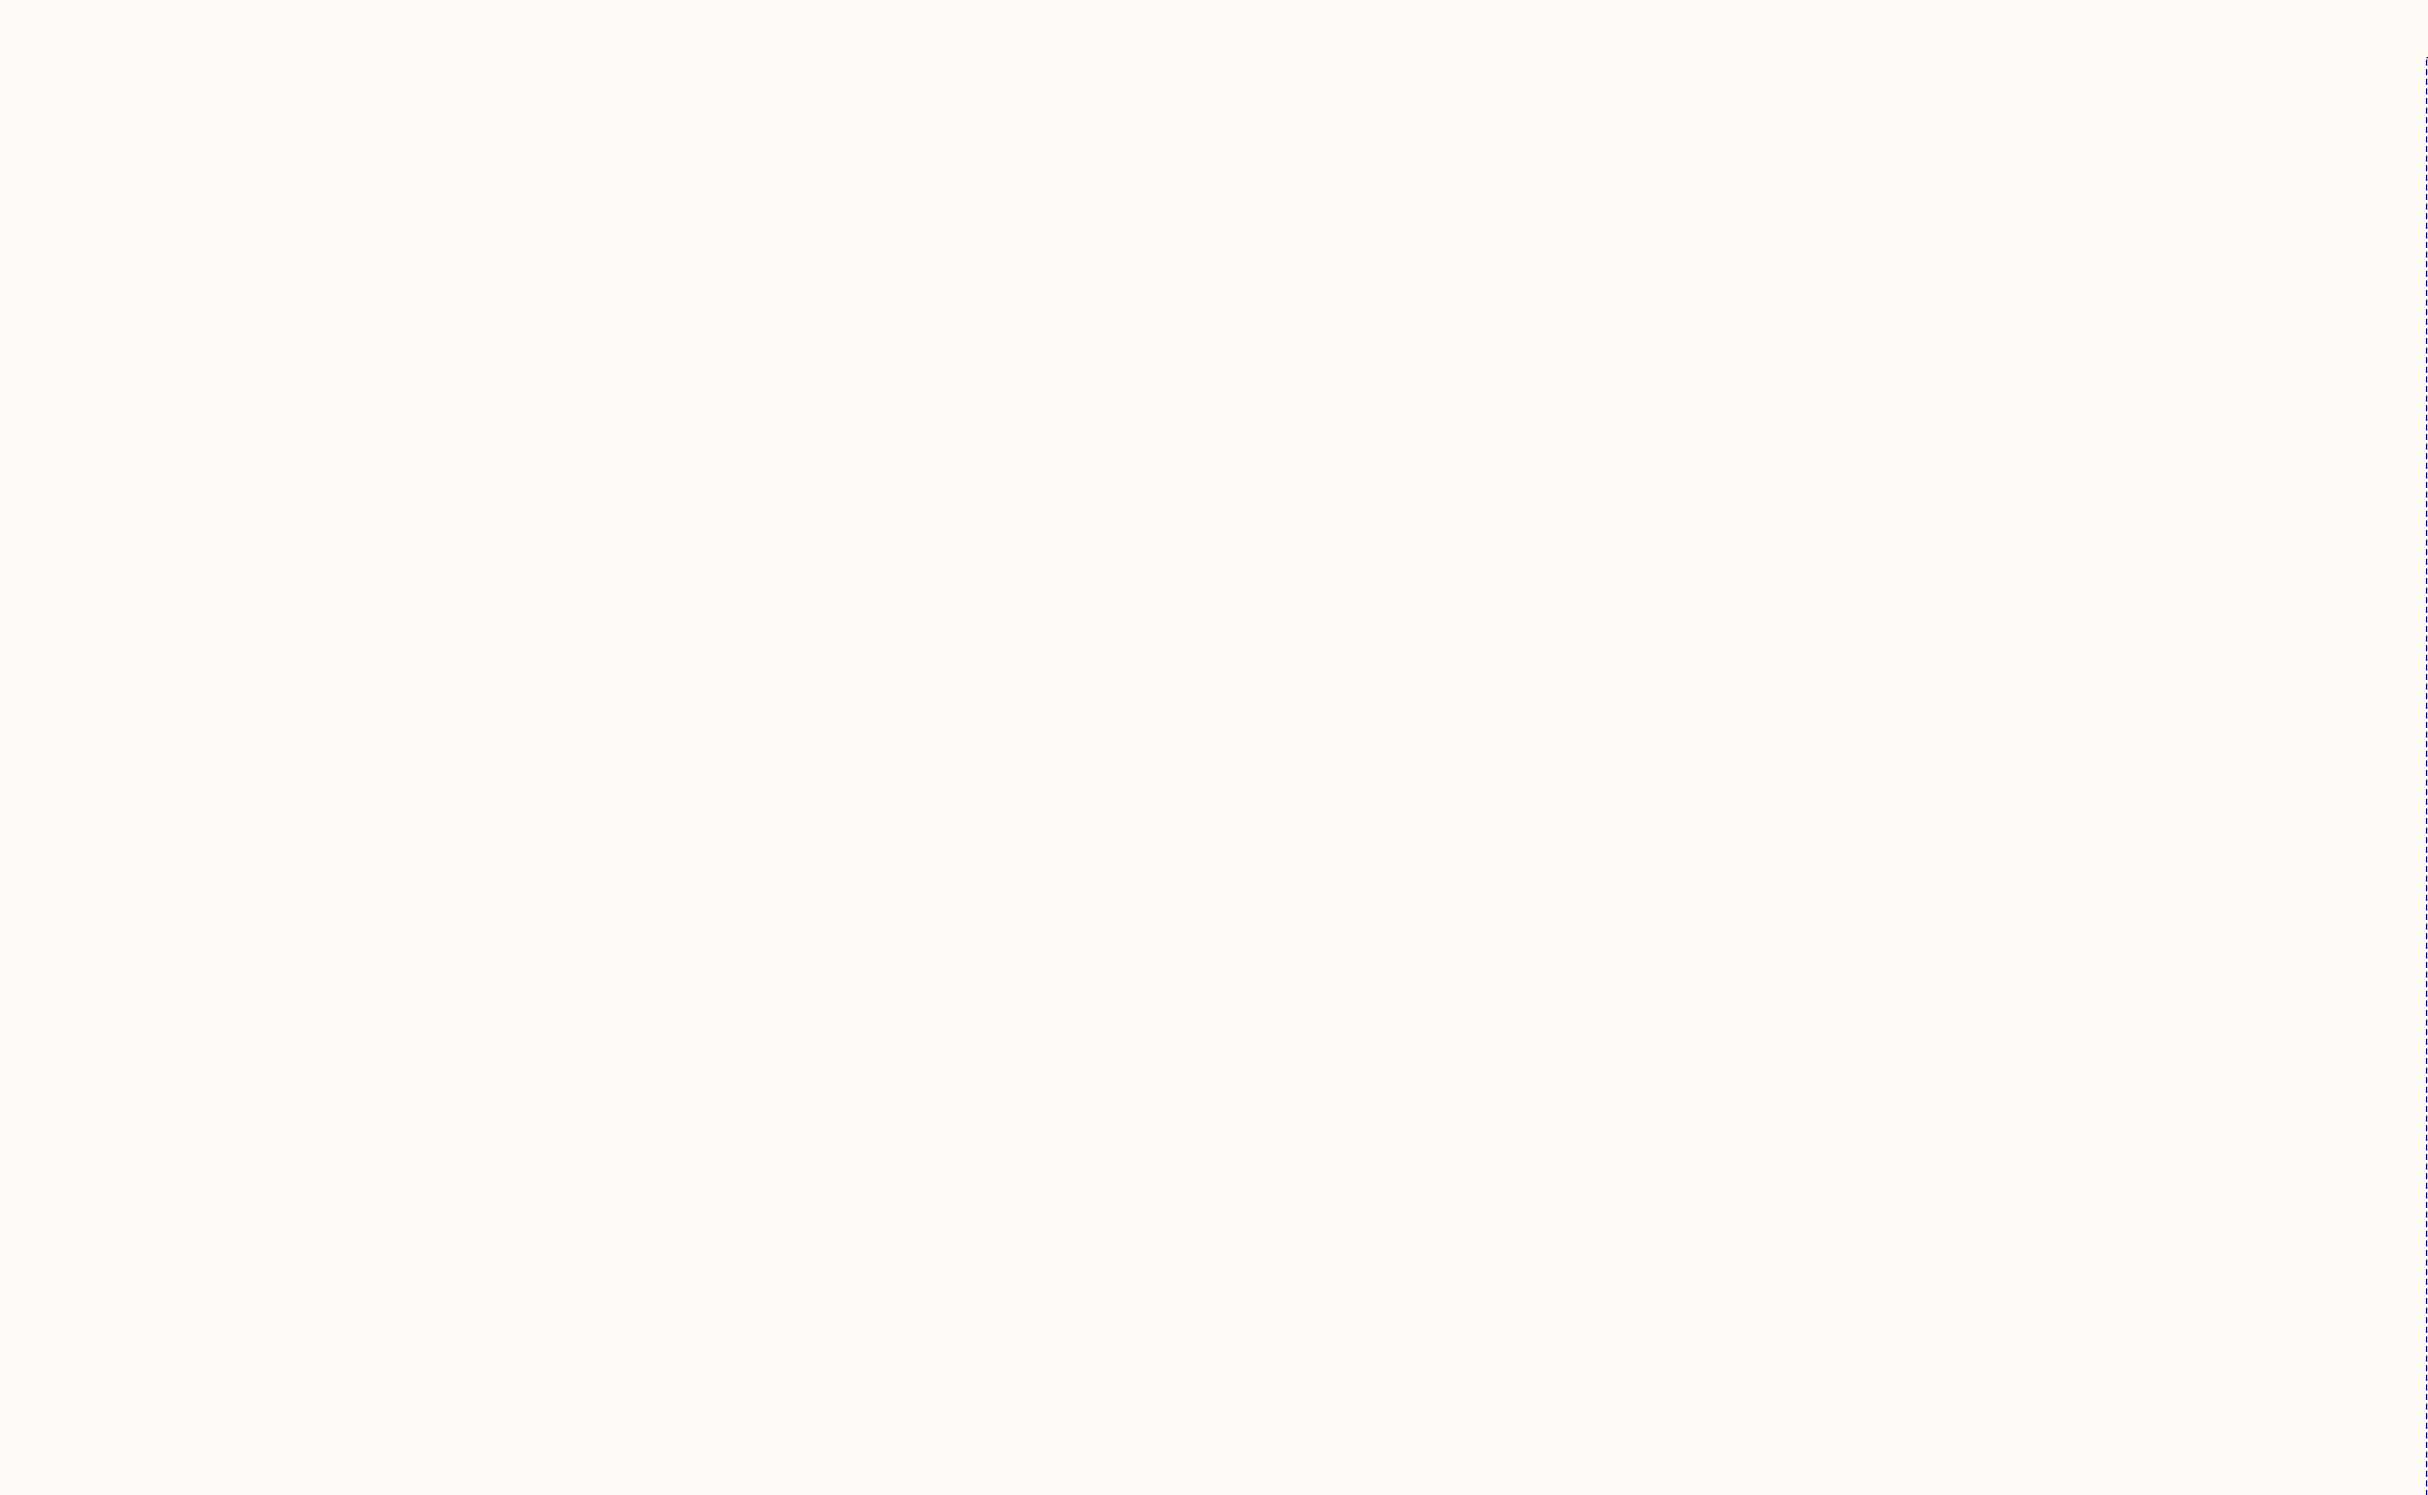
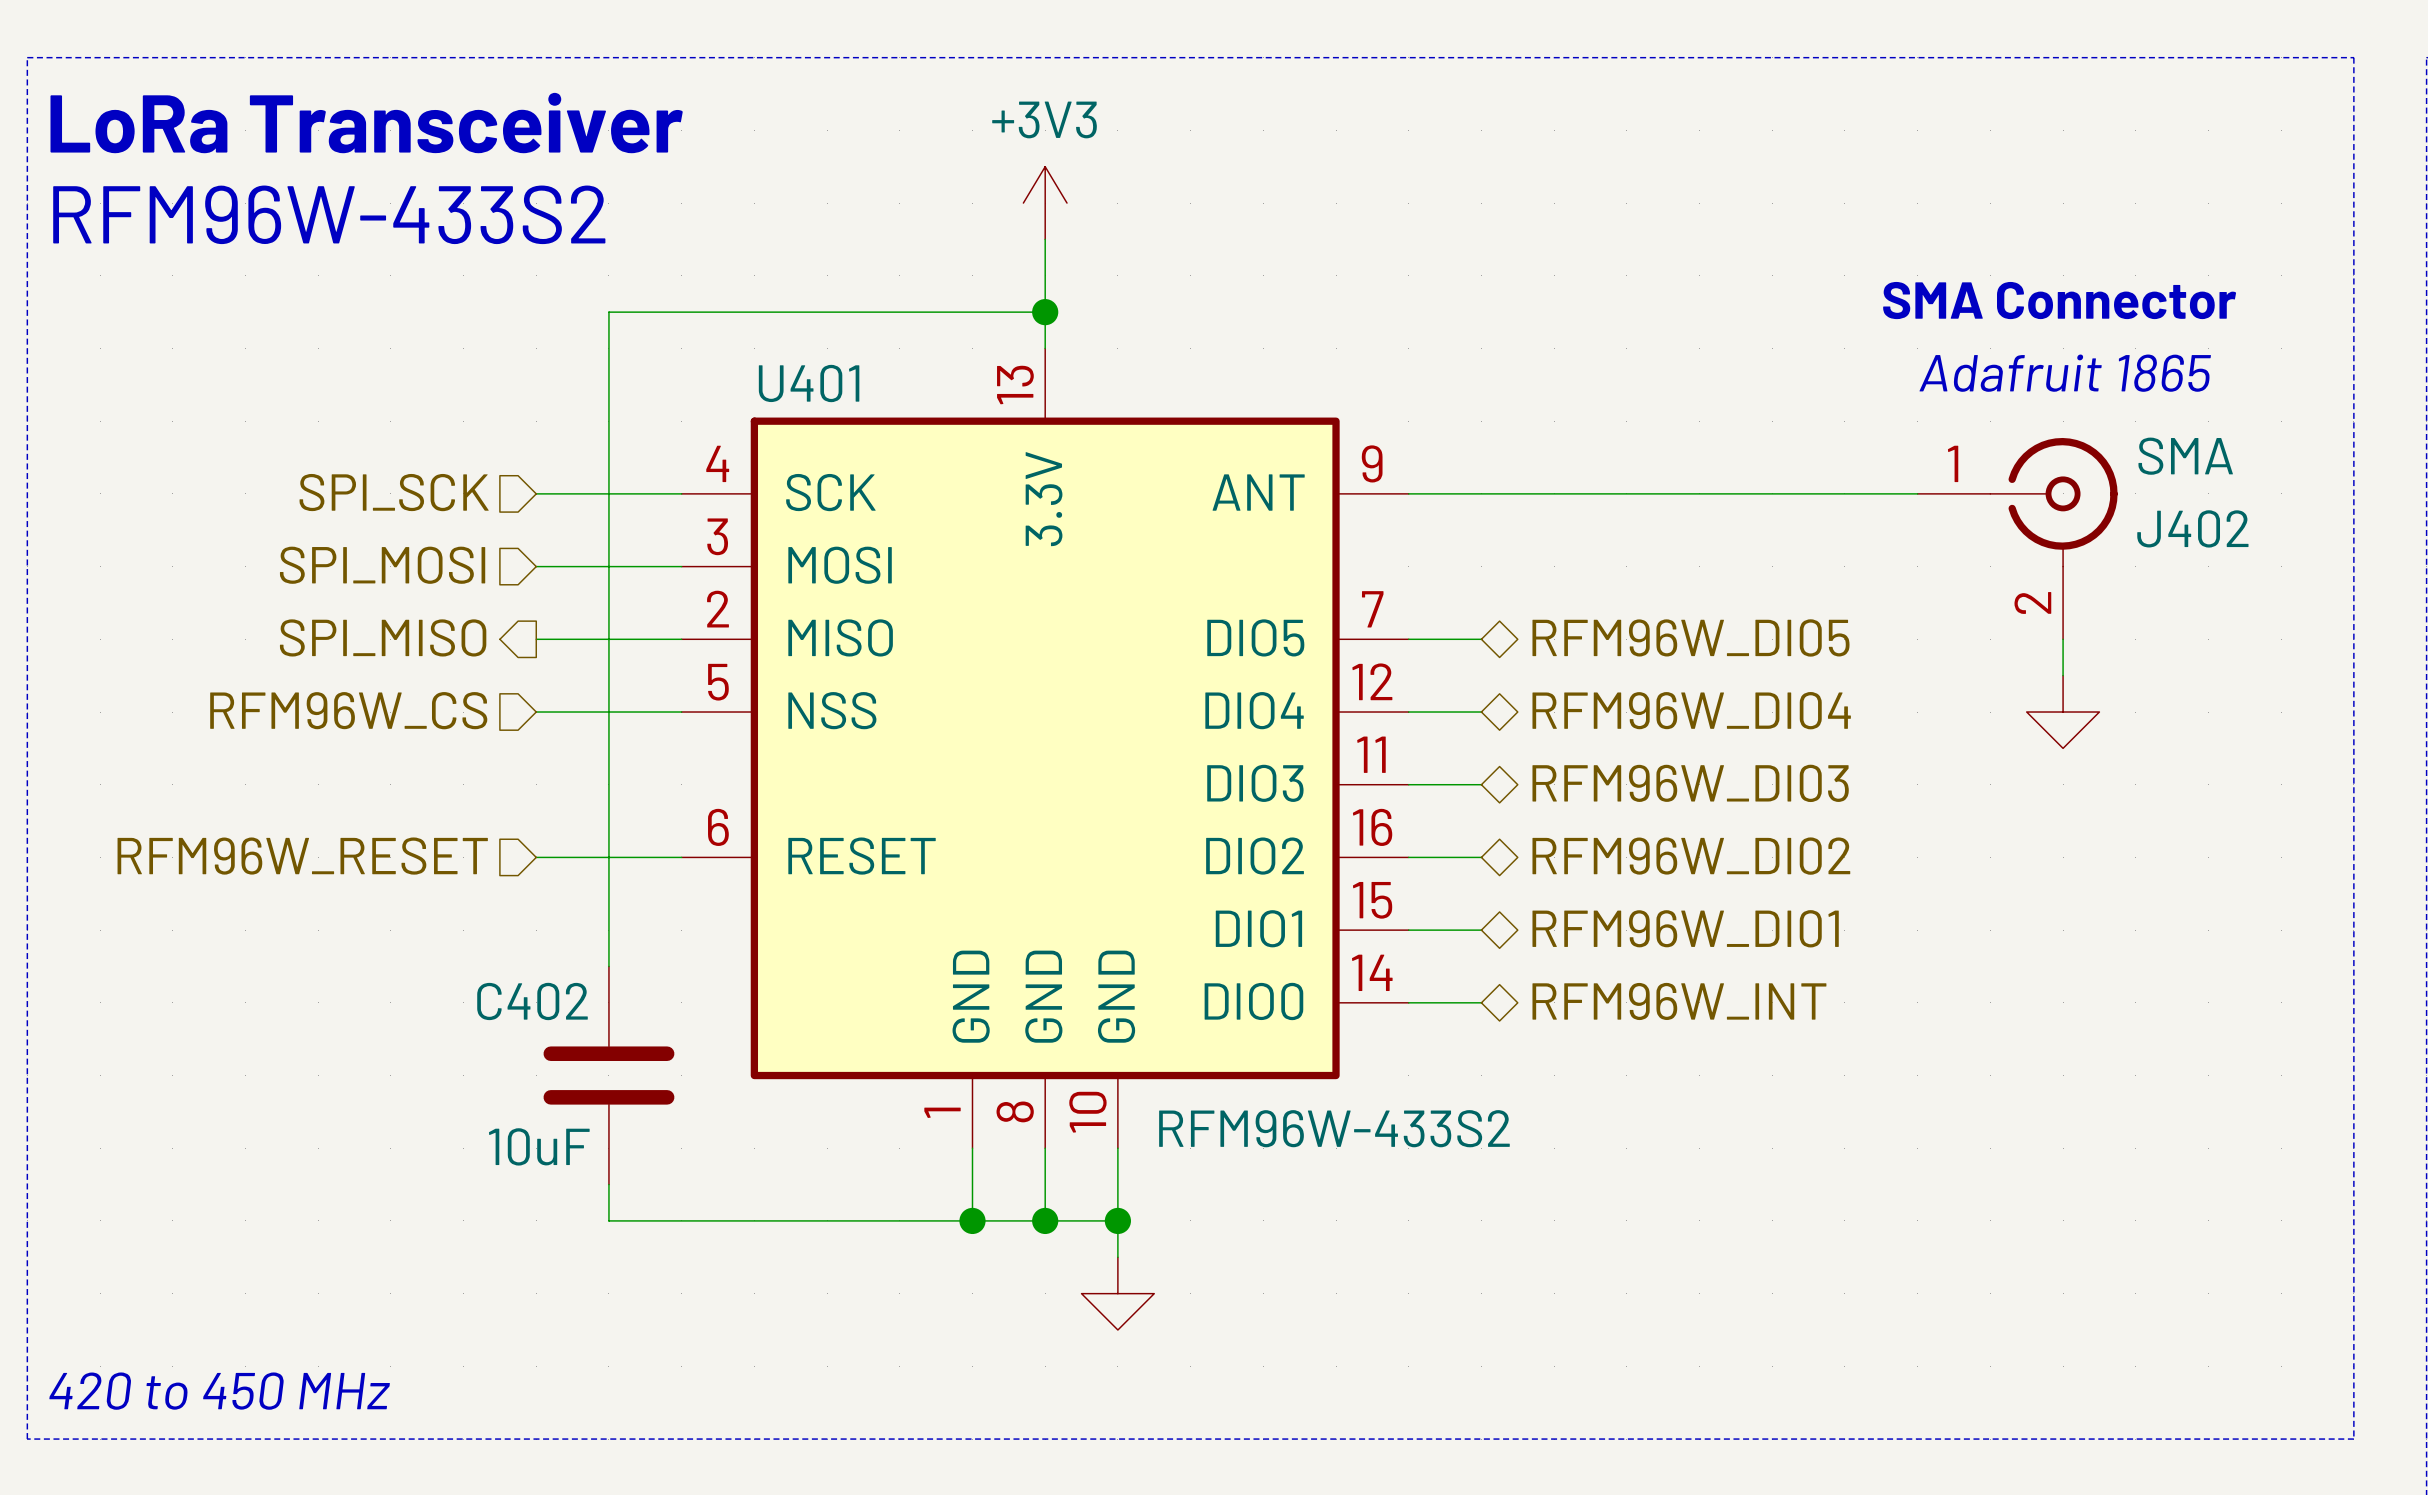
line: none -> (27, 57) (27, 1439) (2353, 1439) (2353, 57) (27, 57)
text: none -> LoRa Transceiver (366, 123)
power symbol: none -> +3V3 (1045, 203)
text: none -> RFM96W-433S2 (329, 214)
wire: none -> (1045, 239) (1045, 348)
text: none -> SMA Connector (2059, 300)
wire: none -> (1045, 312) (608, 312) (608, 966)
junction: none -> (1045, 312)
text: none -> Adafruit 1865 (2065, 373)
wire: none -> (536, 493) (681, 493)
wire: none -> (1408, 493) (1917, 493)
hierarchical label: none -> SPI_SCK (394, 492)
J402: none -> SMA (2017, 538)
wire: none -> (536, 566) (681, 566)
hierarchical label: none -> SPI_MOSI (382, 565)
wire: none -> (536, 639) (681, 639)
wire: none -> (1408, 639) (1481, 639)
wire: none -> (2063, 639) (2063, 675)
hierarchical label: none -> SPI_MISO (383, 637)
hierarchical label: none -> RFM96W_DI05 (1691, 637)
wire: none -> (536, 712) (681, 712)
wire: none -> (1408, 712) (1481, 712)
power symbol: none -> (2063, 712)
hierarchical label: none -> RFM96W_CS (348, 710)
hierarchical label: none -> RFM96W_DI04 (1691, 710)
U401: none -> RFM96W-433S2 (1045, 748)
wire: none -> (1408, 784) (1481, 784)
hierarchical label: none -> RFM96W_DI03 (1690, 783)
wire: none -> (536, 857) (681, 857)
wire: none -> (1408, 857) (1481, 857)
hierarchical label: none -> RFM96W_RESET (302, 856)
hierarchical label: none -> RFM96W_DI02 (1691, 856)
wire: none -> (1408, 930) (1481, 930)
hierarchical label: none -> RFM96W_DI01 (1685, 928)
wire: none -> (1408, 1002) (1481, 1002)
hierarchical label: none -> RFM96W_INT (1679, 1001)
C402: none -> 10uF (608, 1075)
wire: none -> (972, 1148) (972, 1220)
wire: none -> (1045, 1148) (1045, 1220)
wire: none -> (1117, 1148) (1117, 1257)
wire: none -> (608, 1184) (608, 1220) (1117, 1220)
junction: none -> (972, 1220)
junction: none -> (1045, 1220)
junction: none -> (1117, 1220)
power symbol: none -> (1117, 1293)
text: none -> 420 to 450 MHz (219, 1391)

